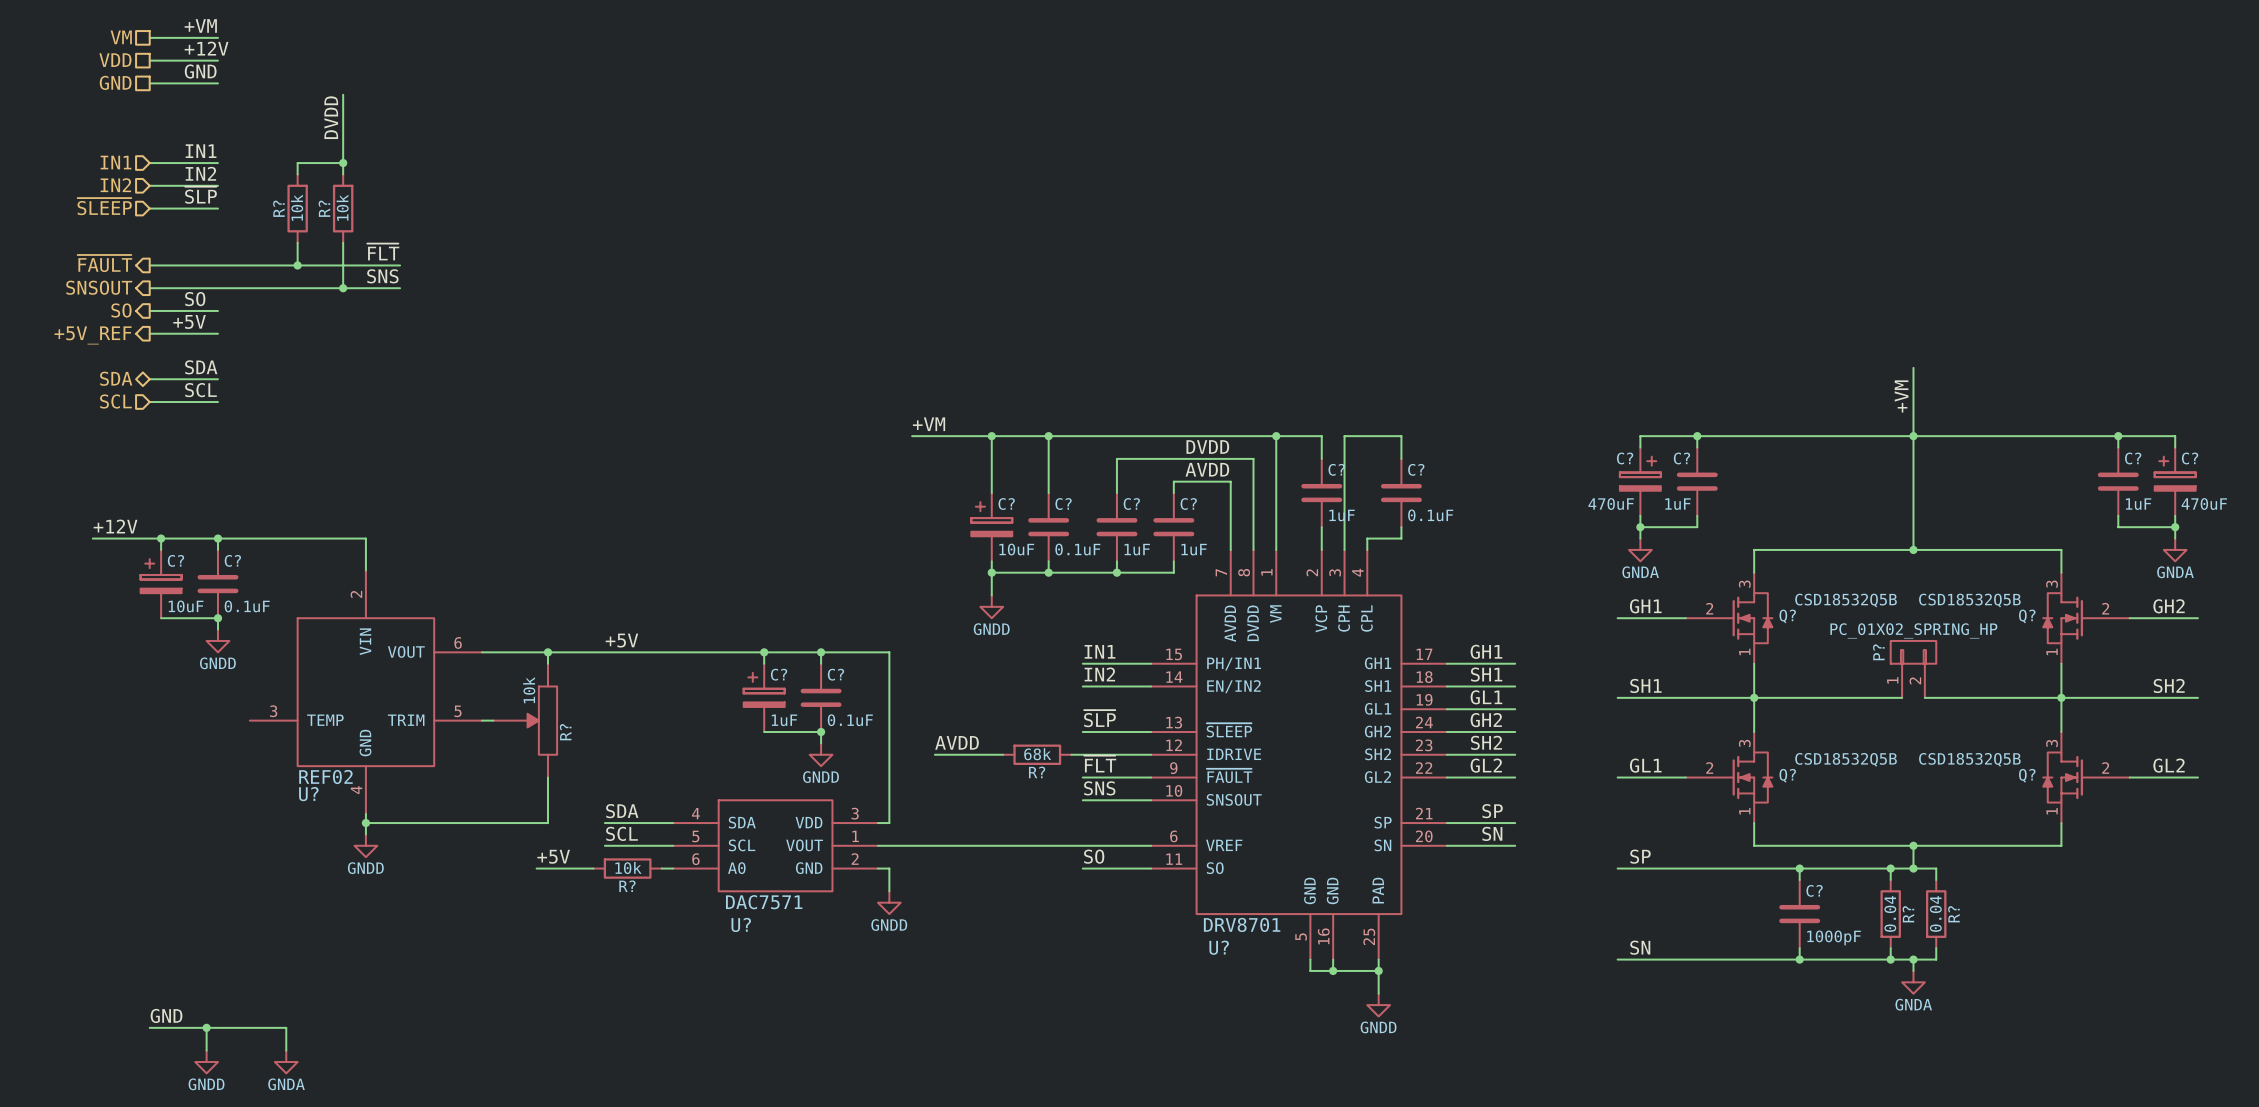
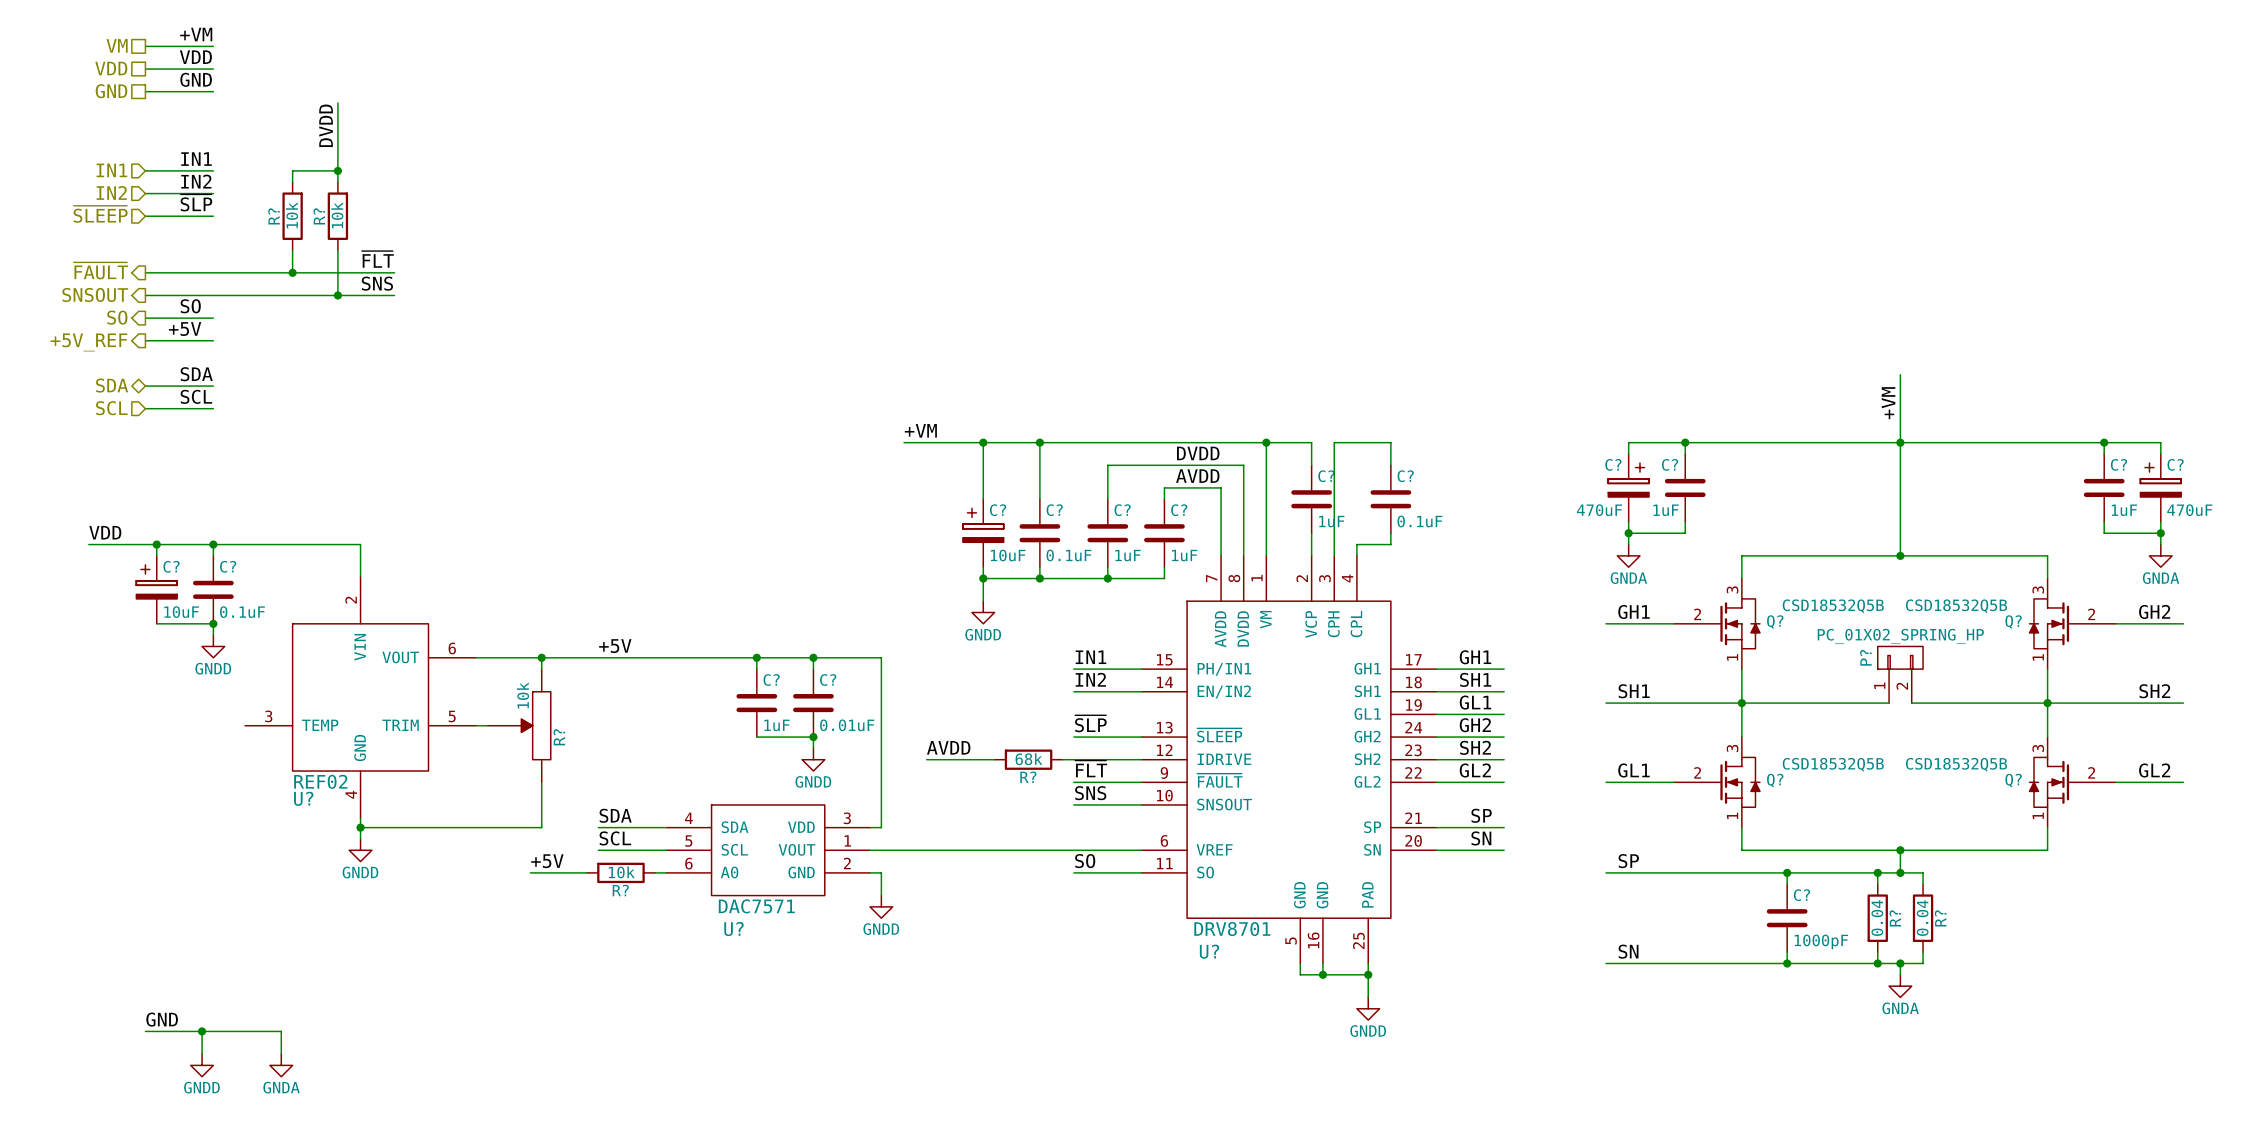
label: +12V (206, 48) -> VDD (195, 57)
label: +12V (115, 526) -> VDD (105, 532)
C? symbol: [743, 663, 785, 733] -> [736, 669, 778, 738]
C? value: 0.1uF (850, 720) -> 0.01uF (847, 725)

